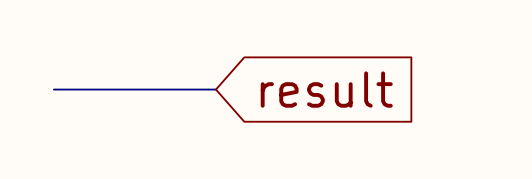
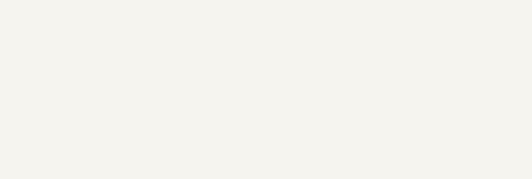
wire: (53, 89) (215, 89) -> none
global label: result (326, 89) -> none

